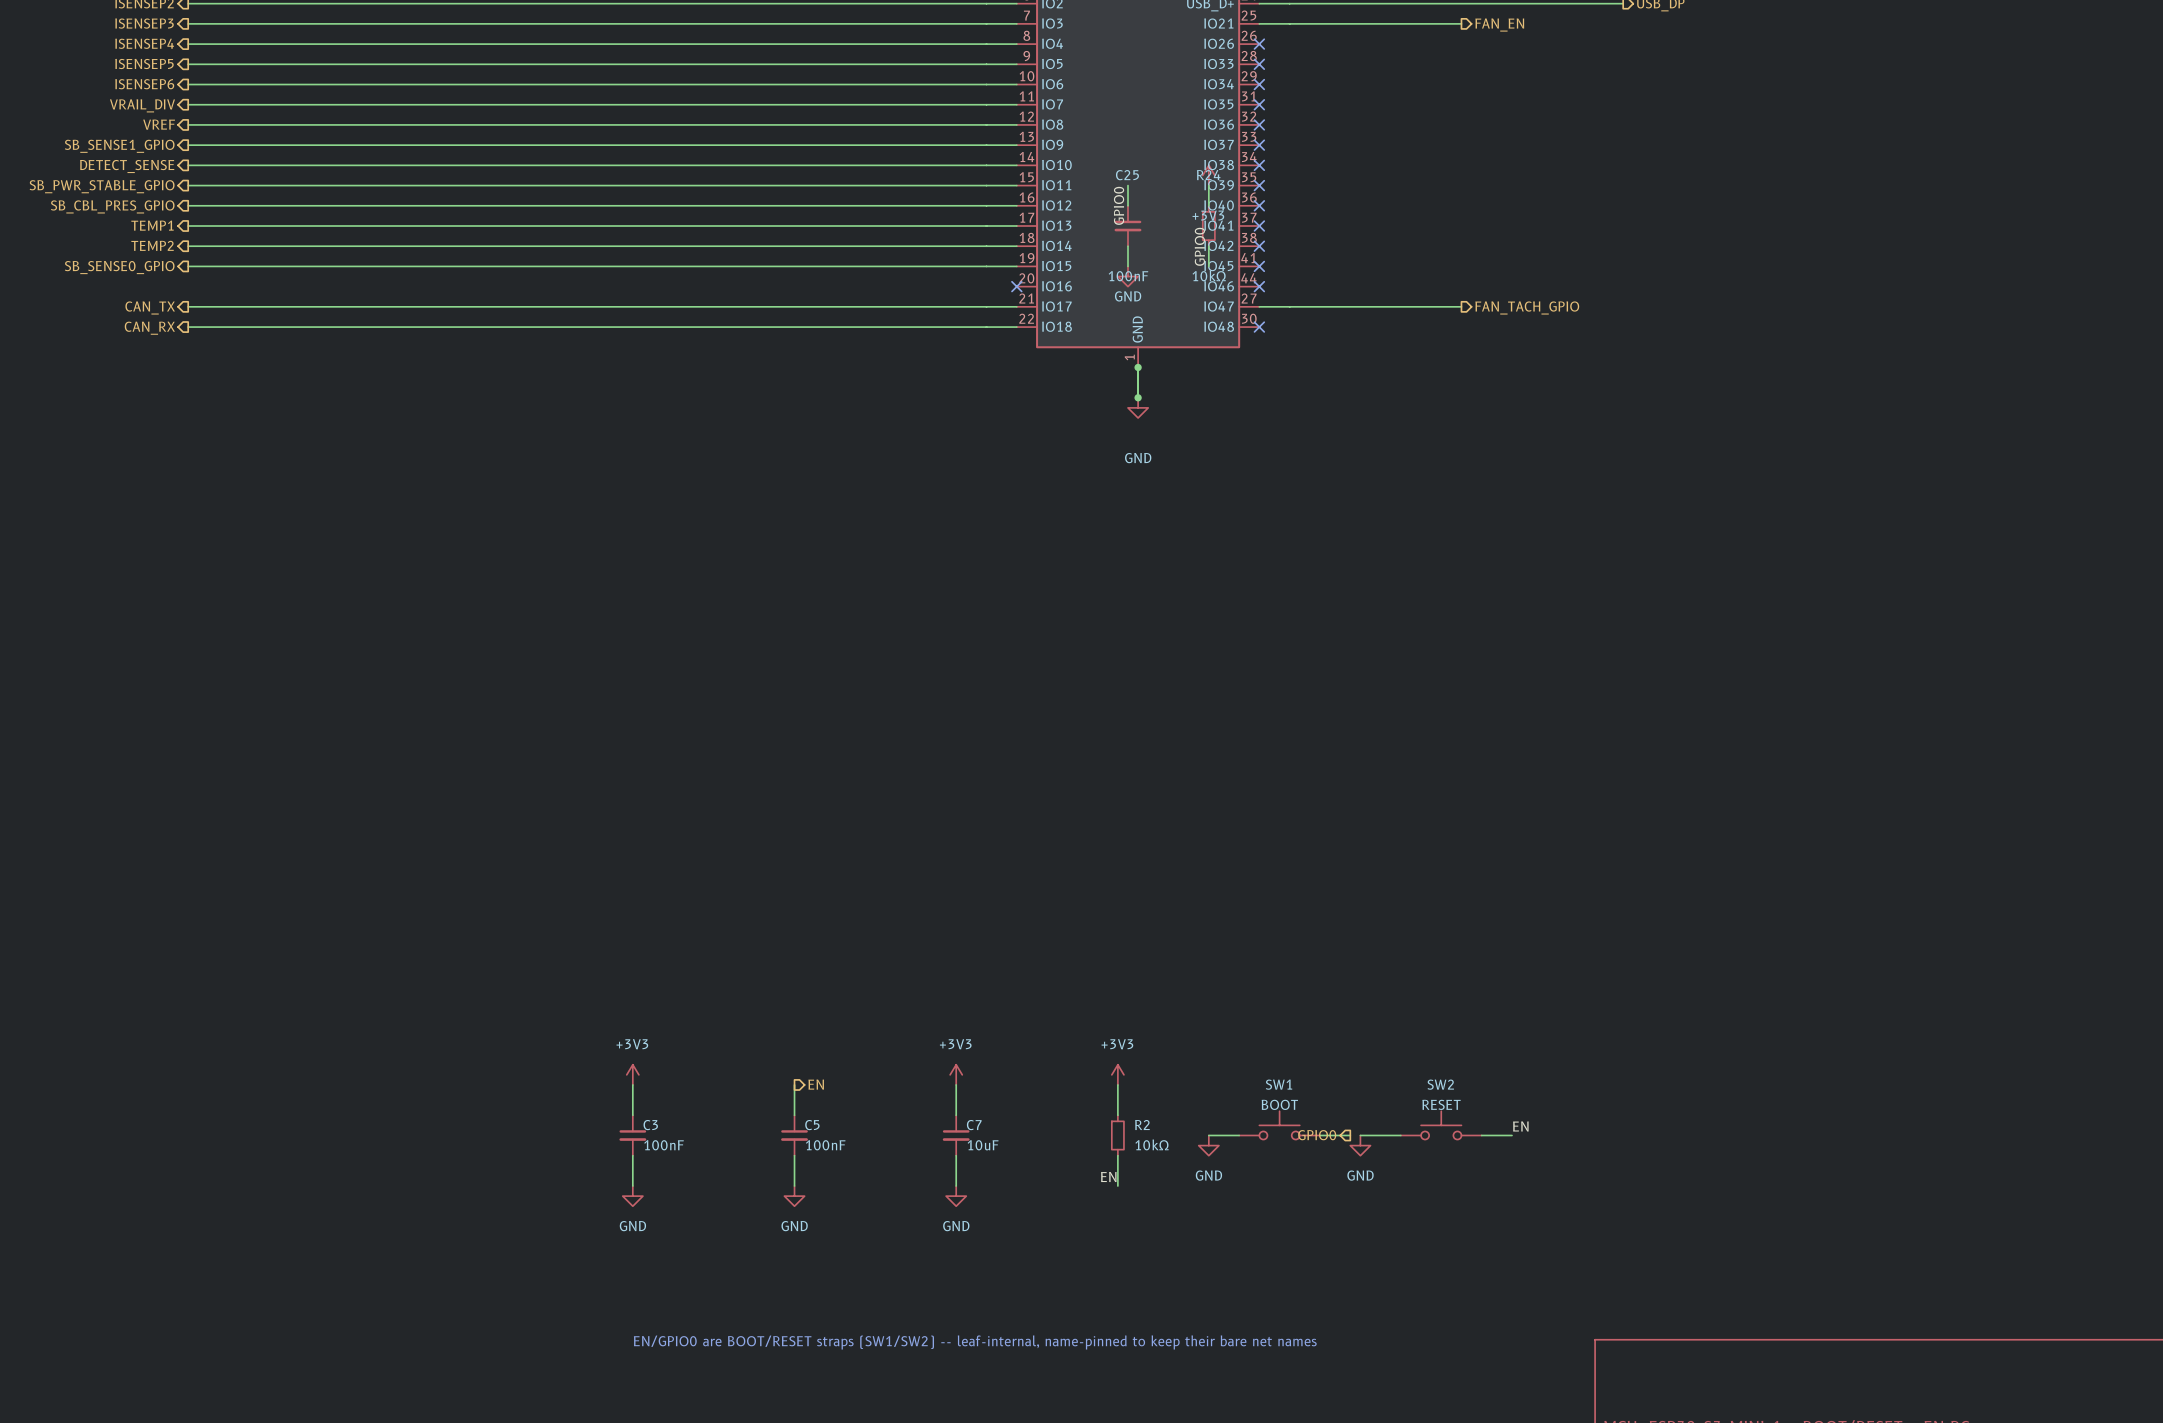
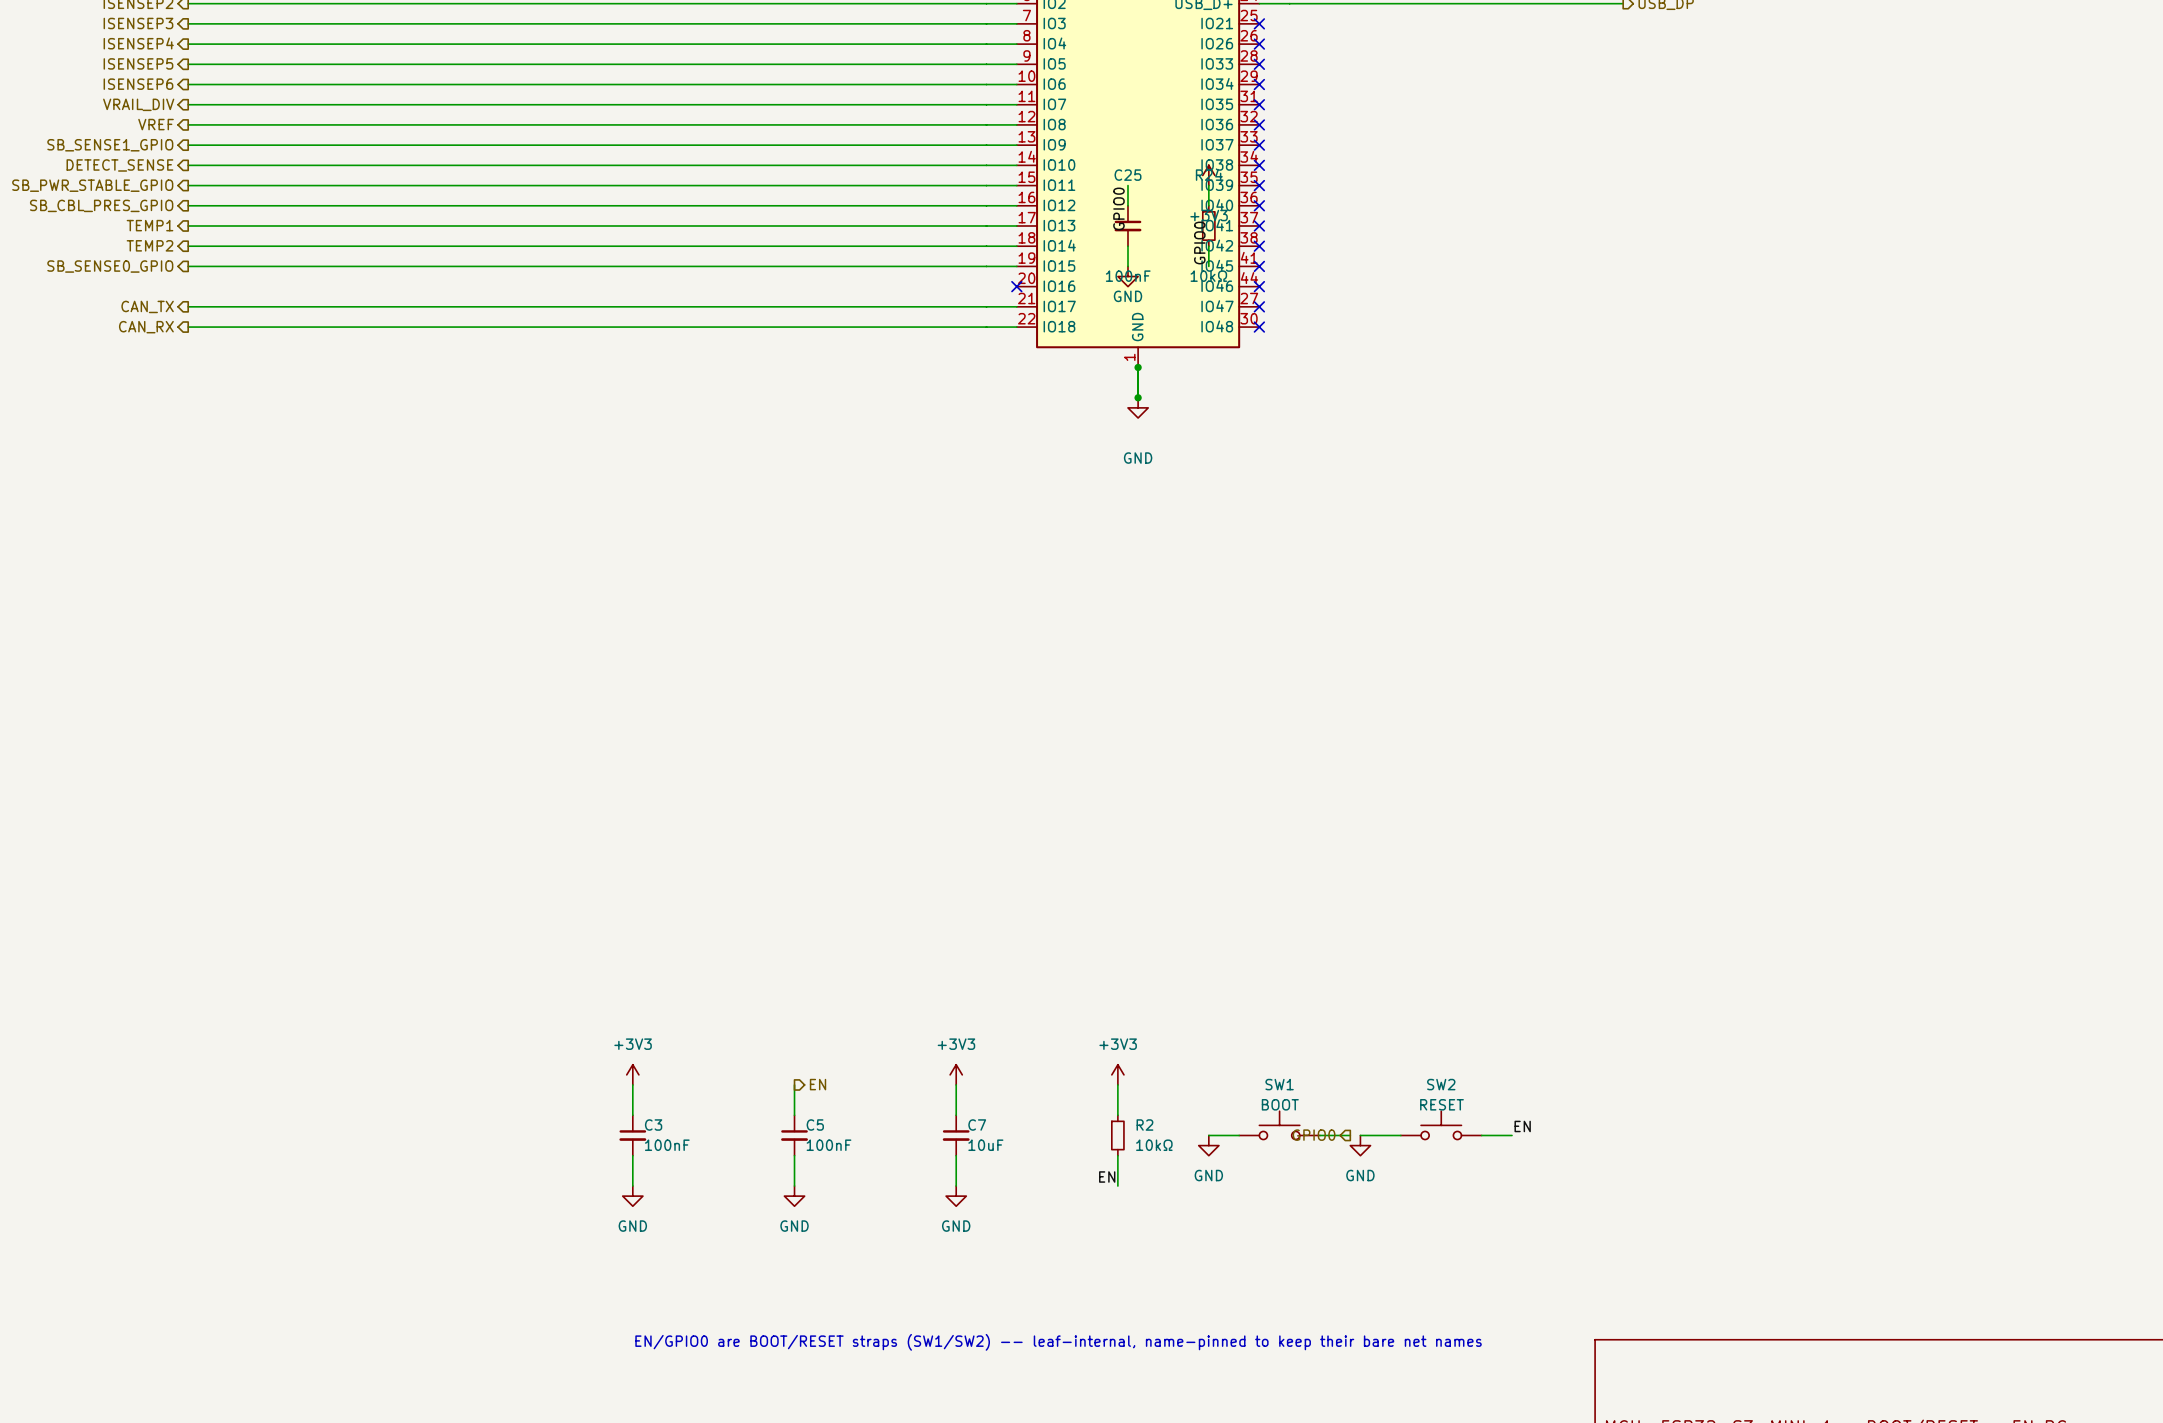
wire: (1259, 23) (1461, 23) -> none
no-connect mark: none -> (1259, 23)
hierarchical label: FAN_EN (1499, 25) -> none
wire: (1259, 306) (1461, 306) -> none
no-connect mark: none -> (1259, 306)
hierarchical label: FAN_TACH_GPIO (1527, 307) -> none

